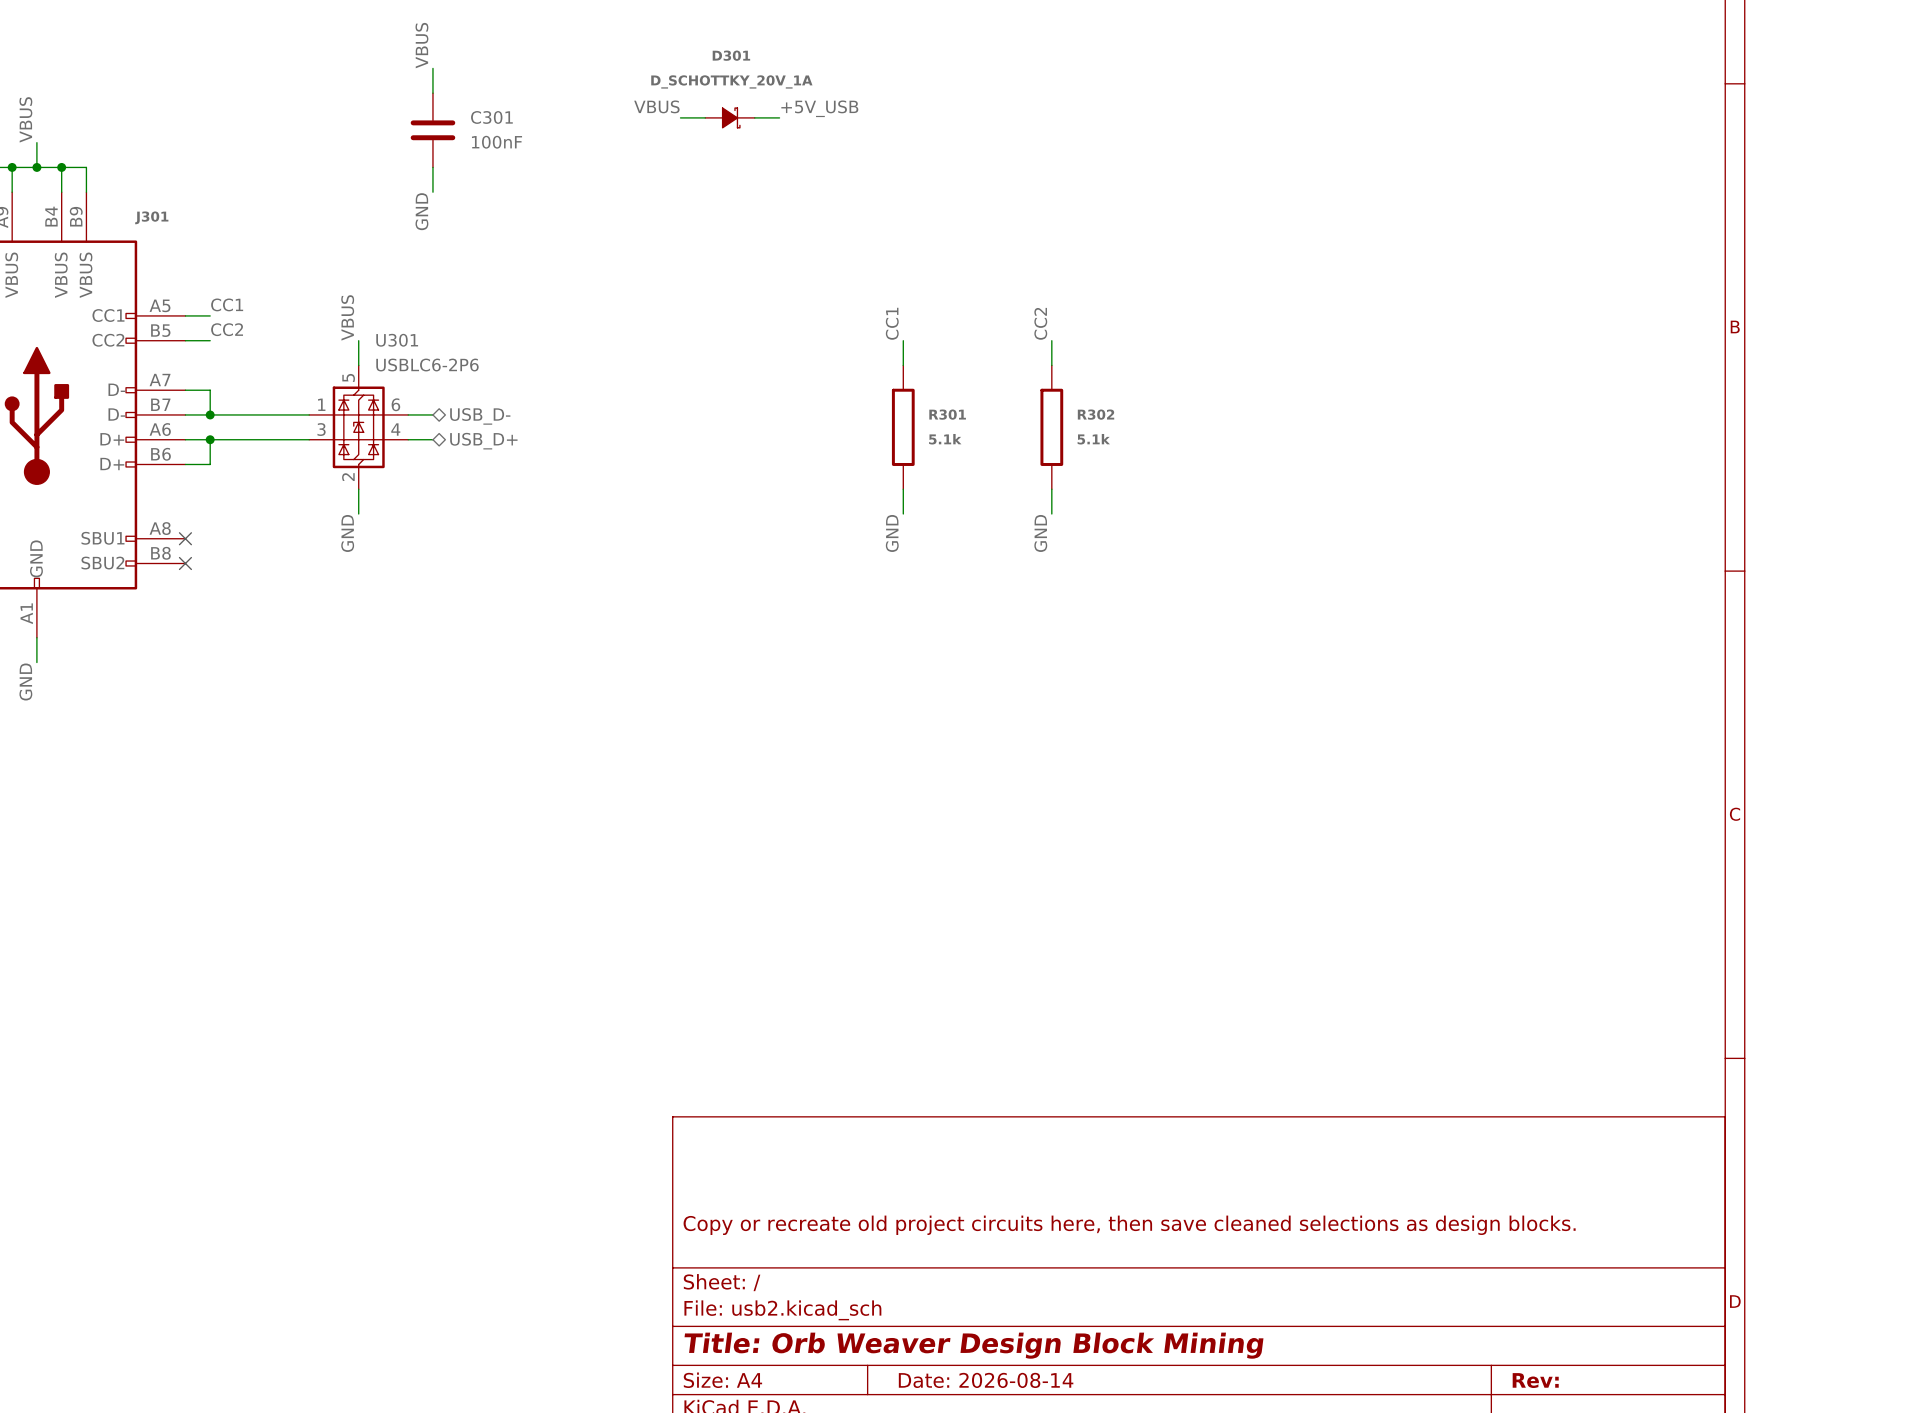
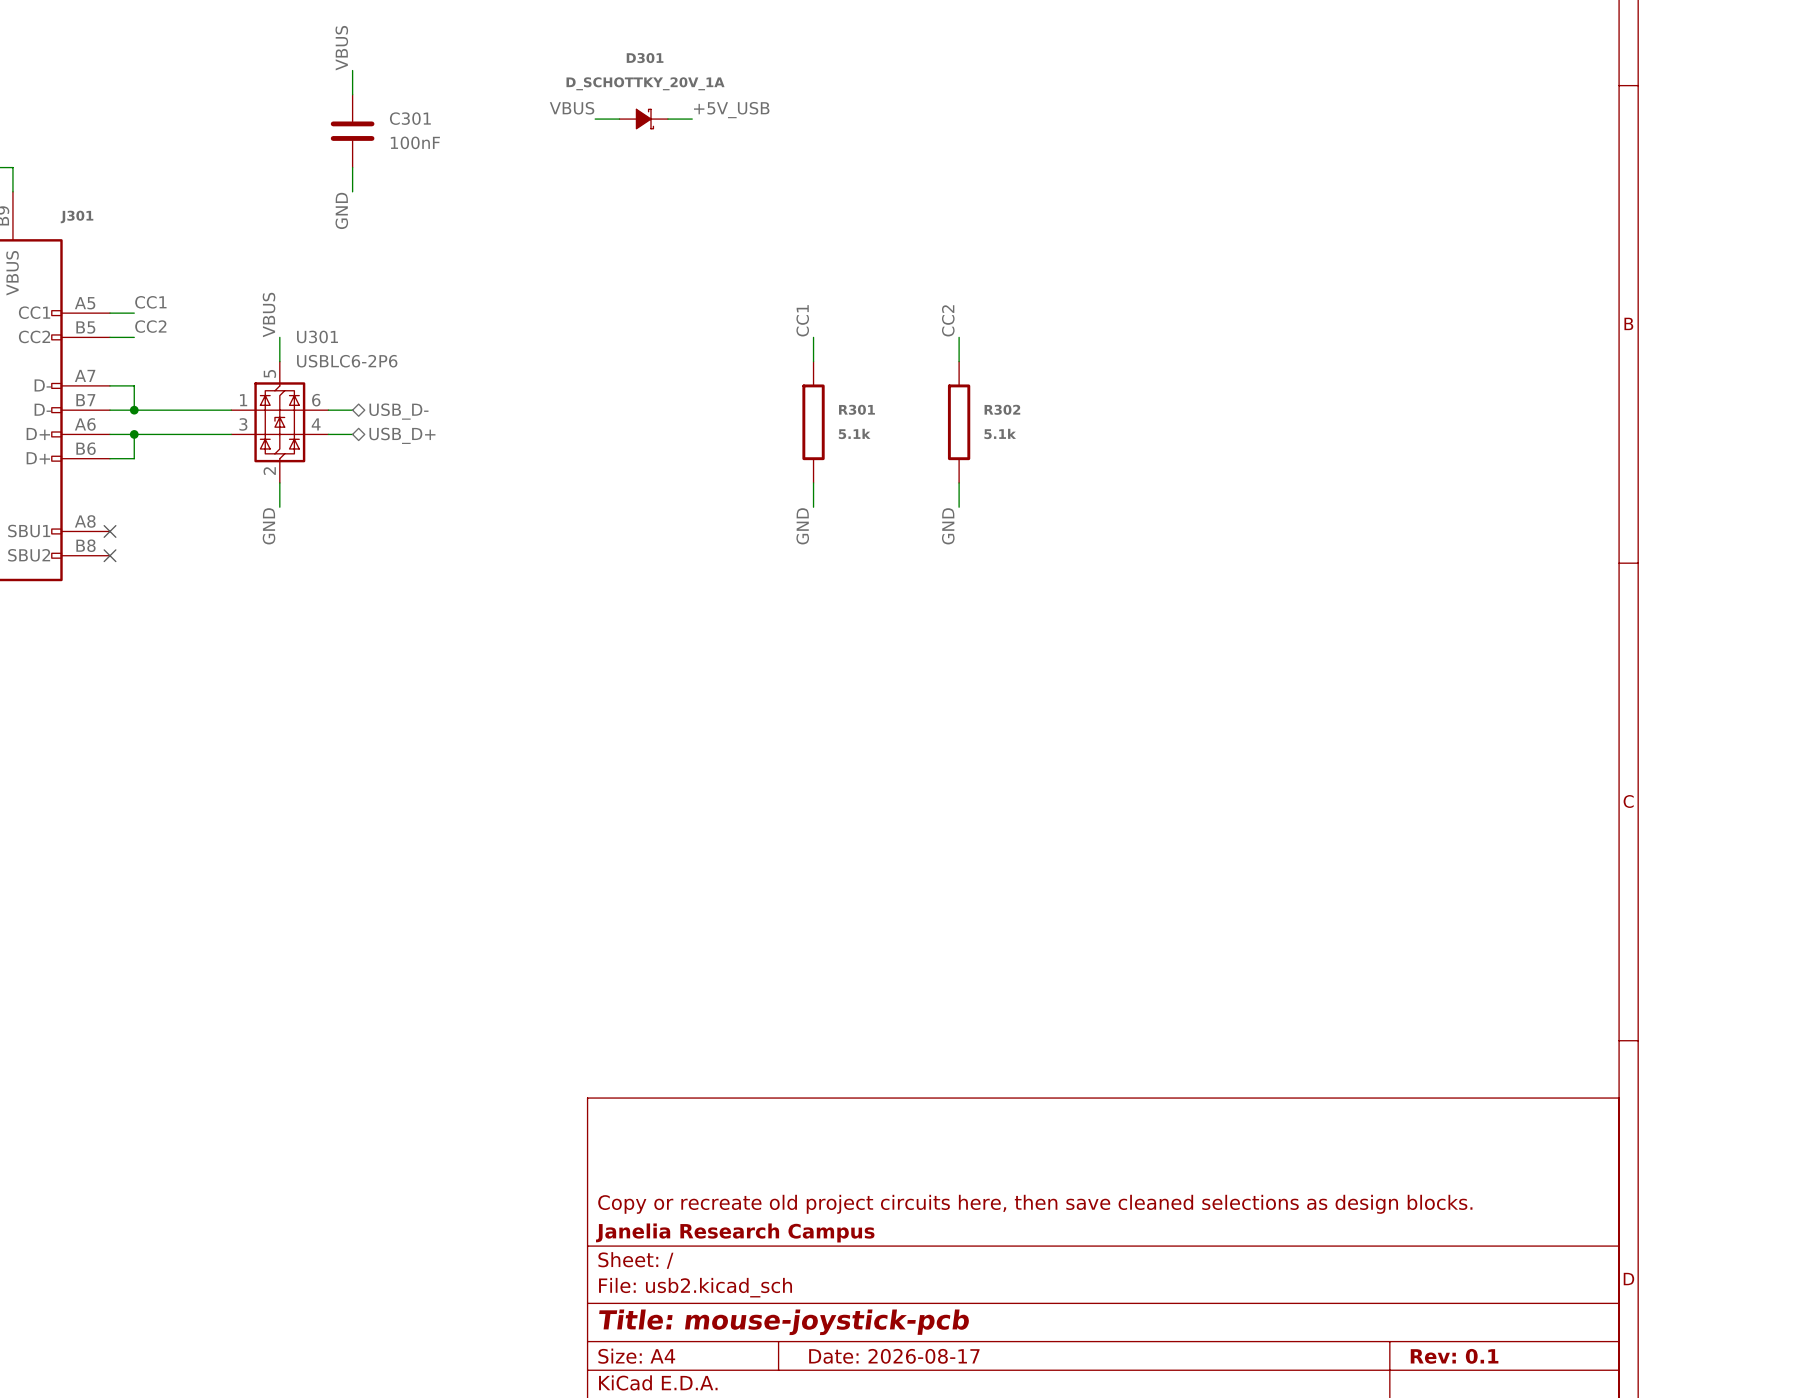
title block: none -> Janelia Research Campus (735, 1232)
title block: Title: Orb Weaver Design Block Mining (974, 1345) -> Title: mouse-joystick-pcb (784, 1322)
title block: Date: 2026-08-14 (986, 1380) -> Date: 2026-08-17 (894, 1356)
title block: Rev: (1535, 1380) -> Rev: 0.1 (1454, 1356)

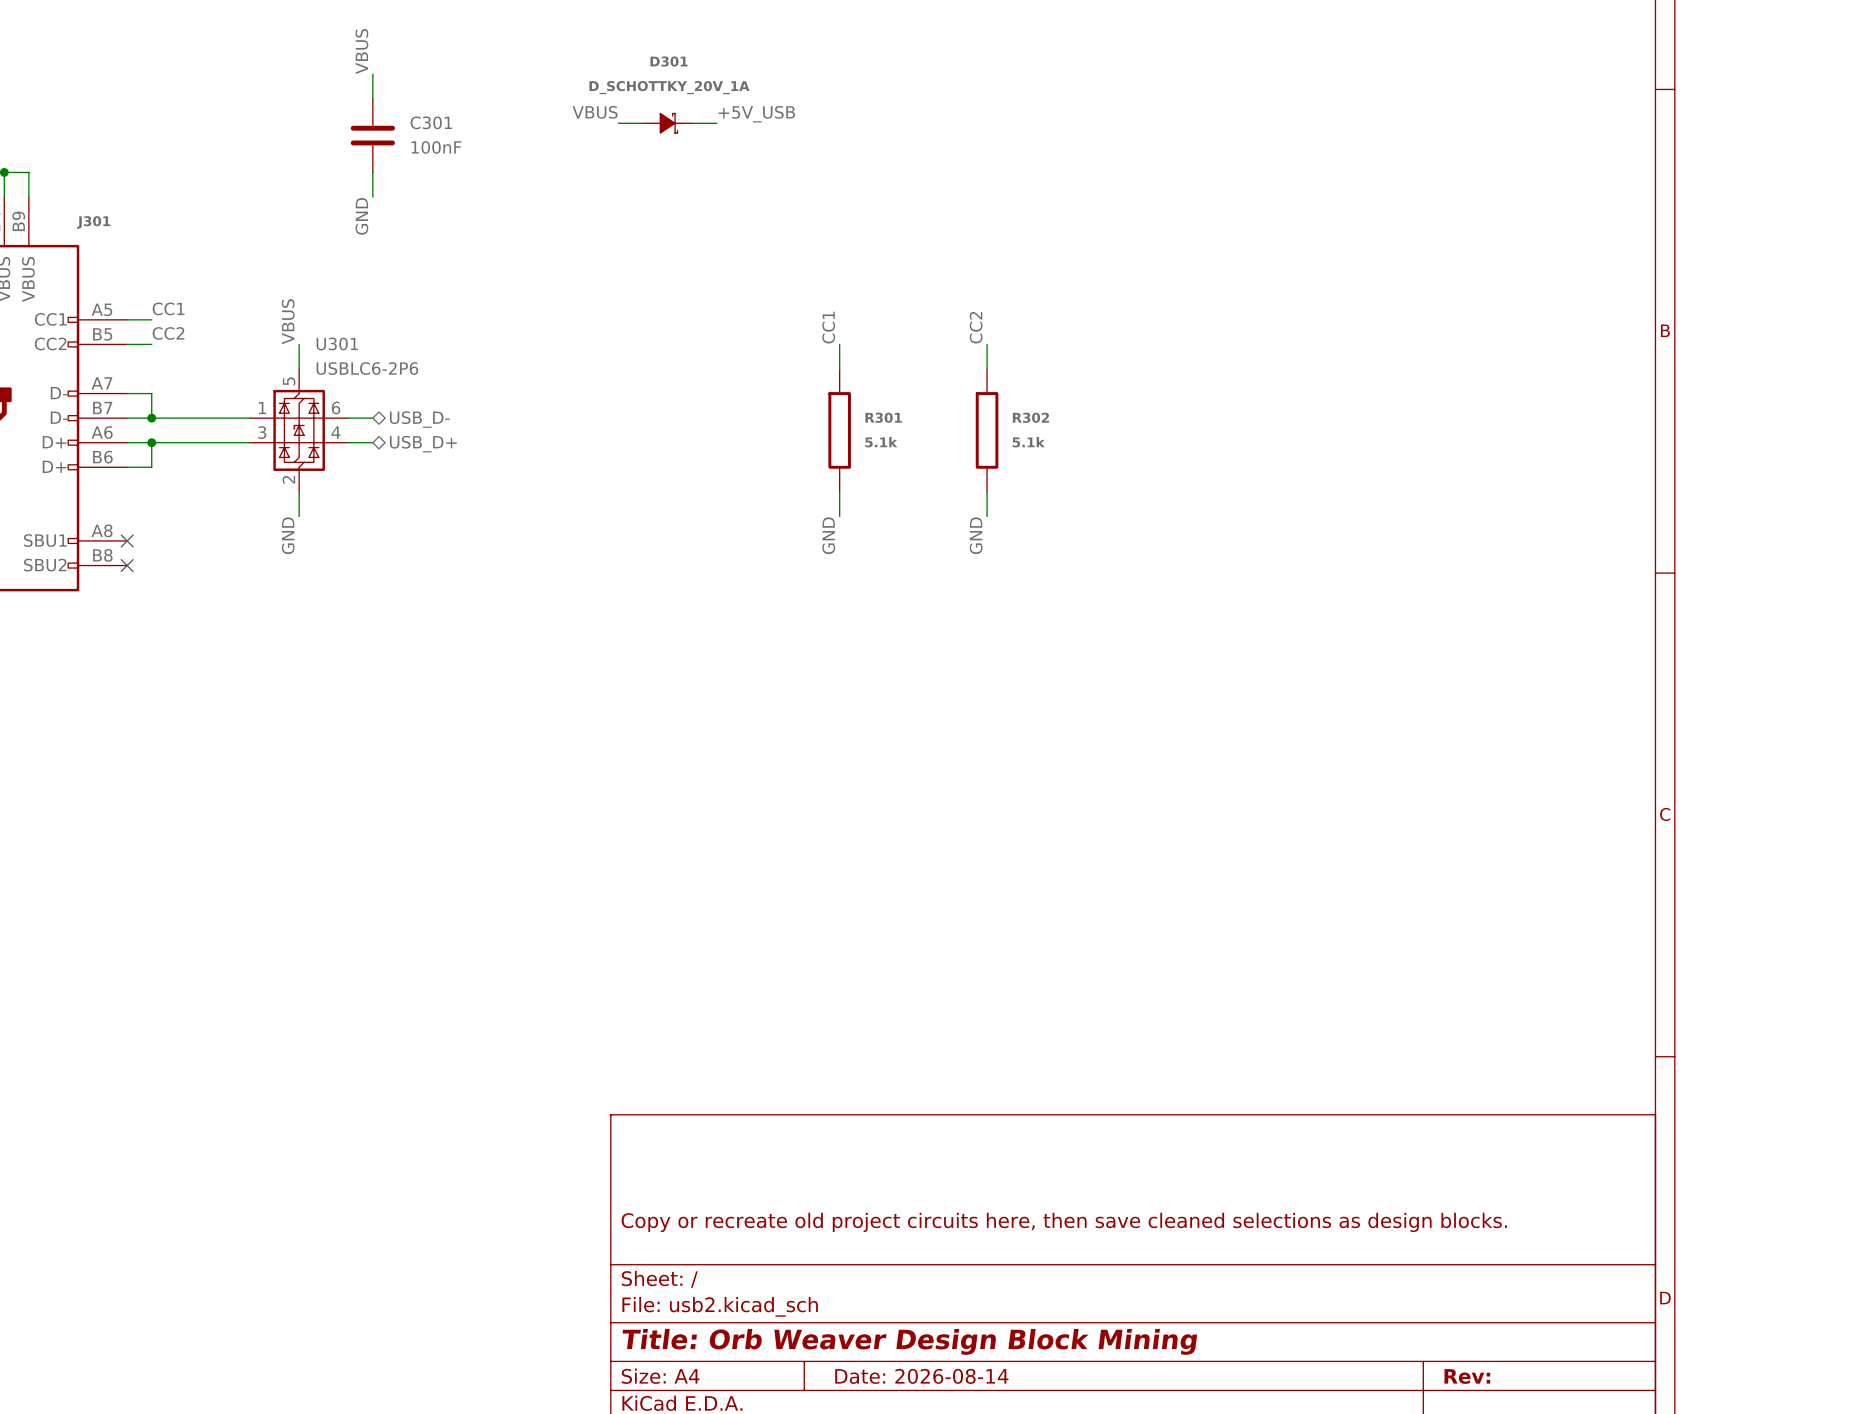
title block: Janelia Research Campus (735, 1232) -> none
title block: Title: mouse-joystick-pcb (784, 1322) -> Title: Orb Weaver Design Block Mining (909, 1341)
title block: Date: 2026-08-17 (894, 1356) -> Date: 2026-08-14 (921, 1376)
title block: Rev: 0.1 (1454, 1356) -> Rev: (1467, 1376)

